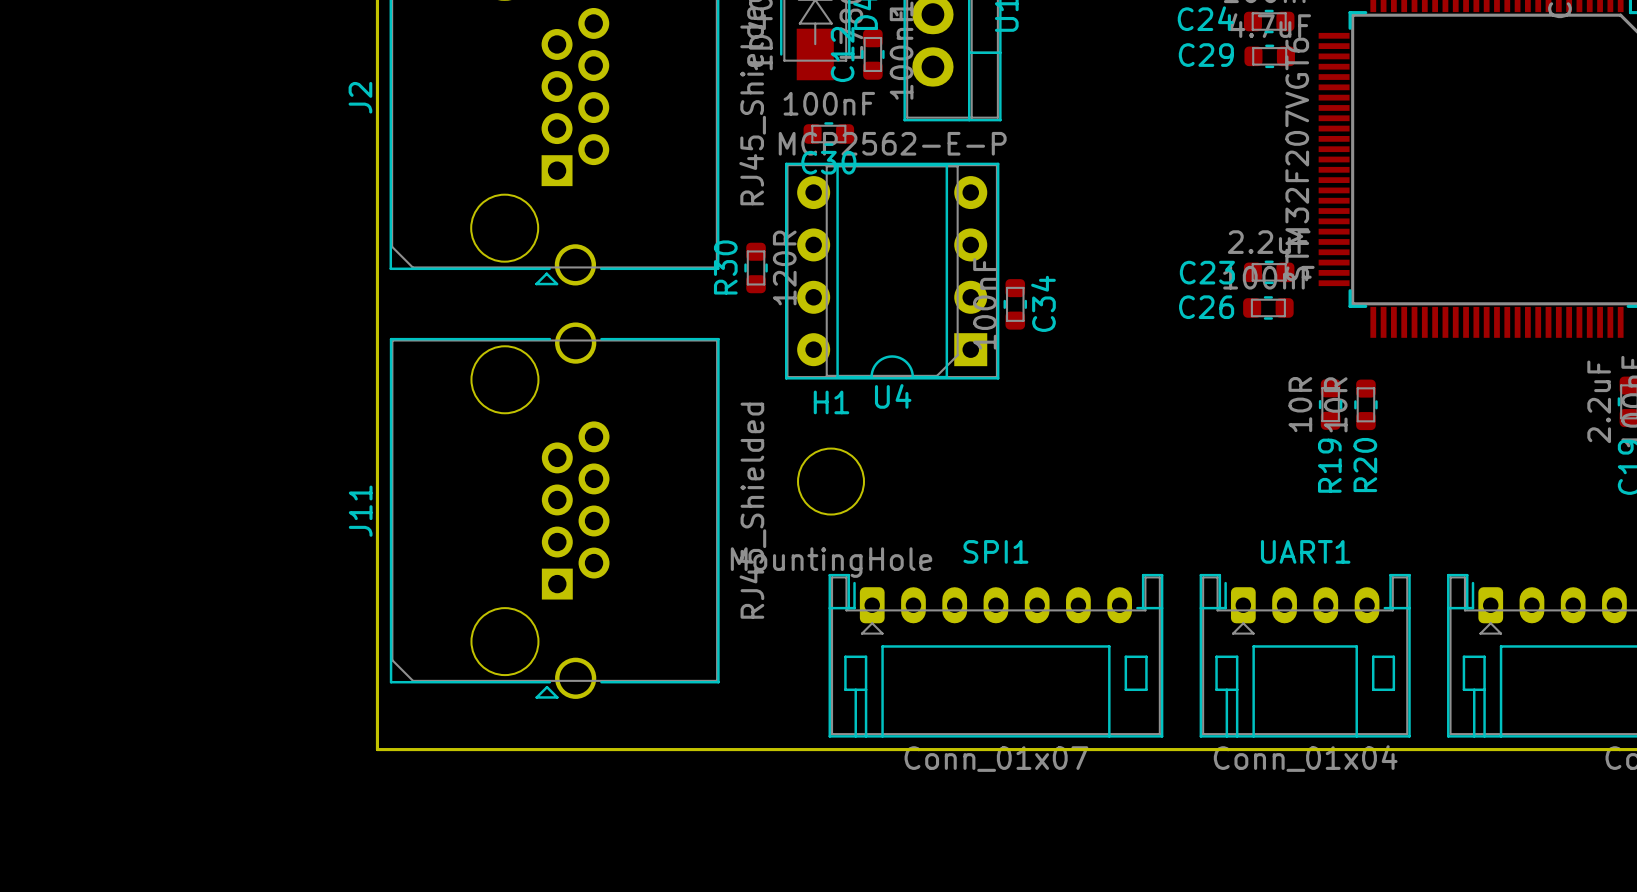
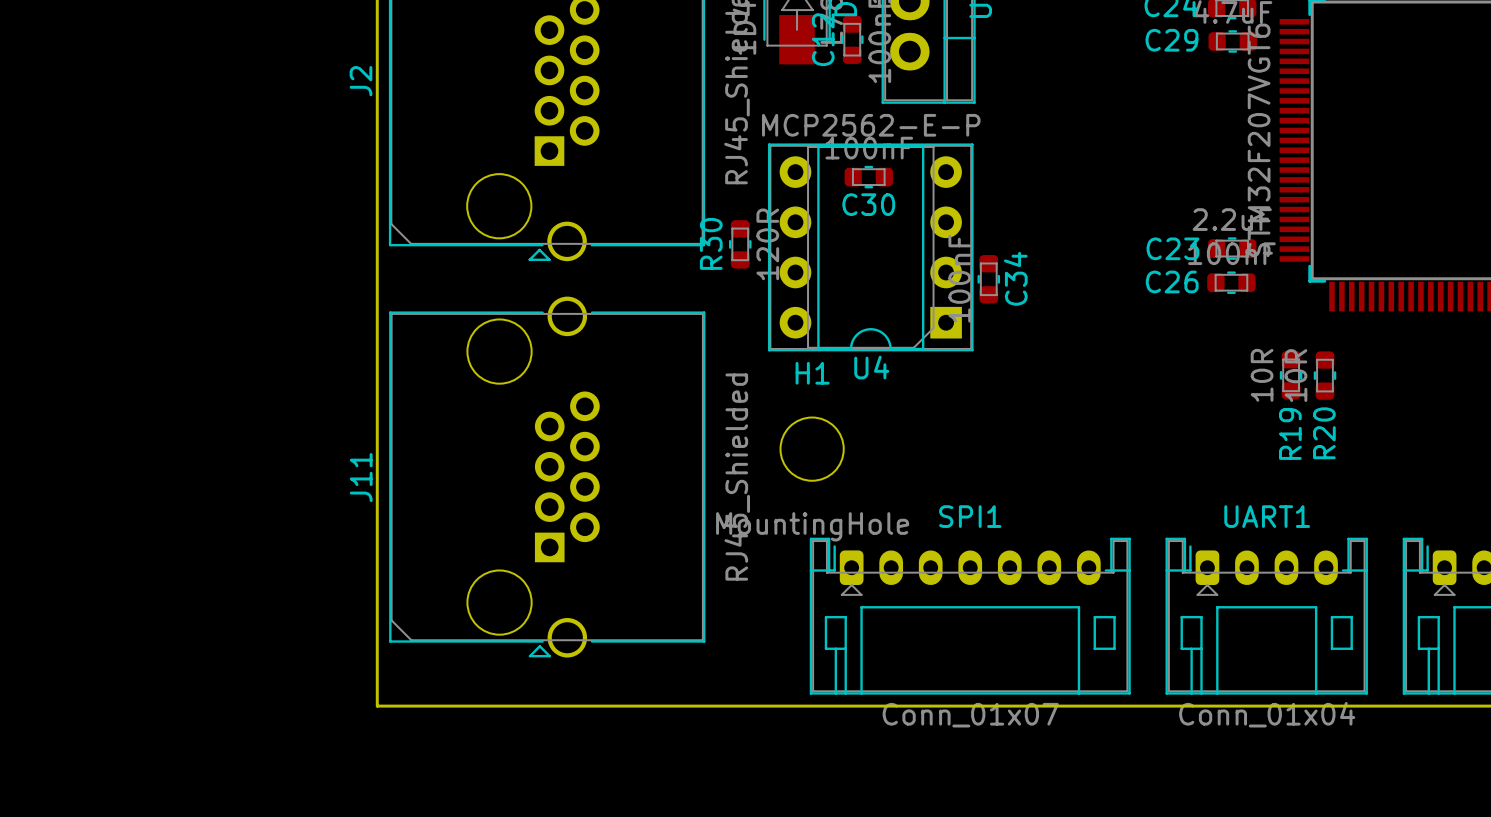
C30 position: (828, 133) -> (868, 177)

